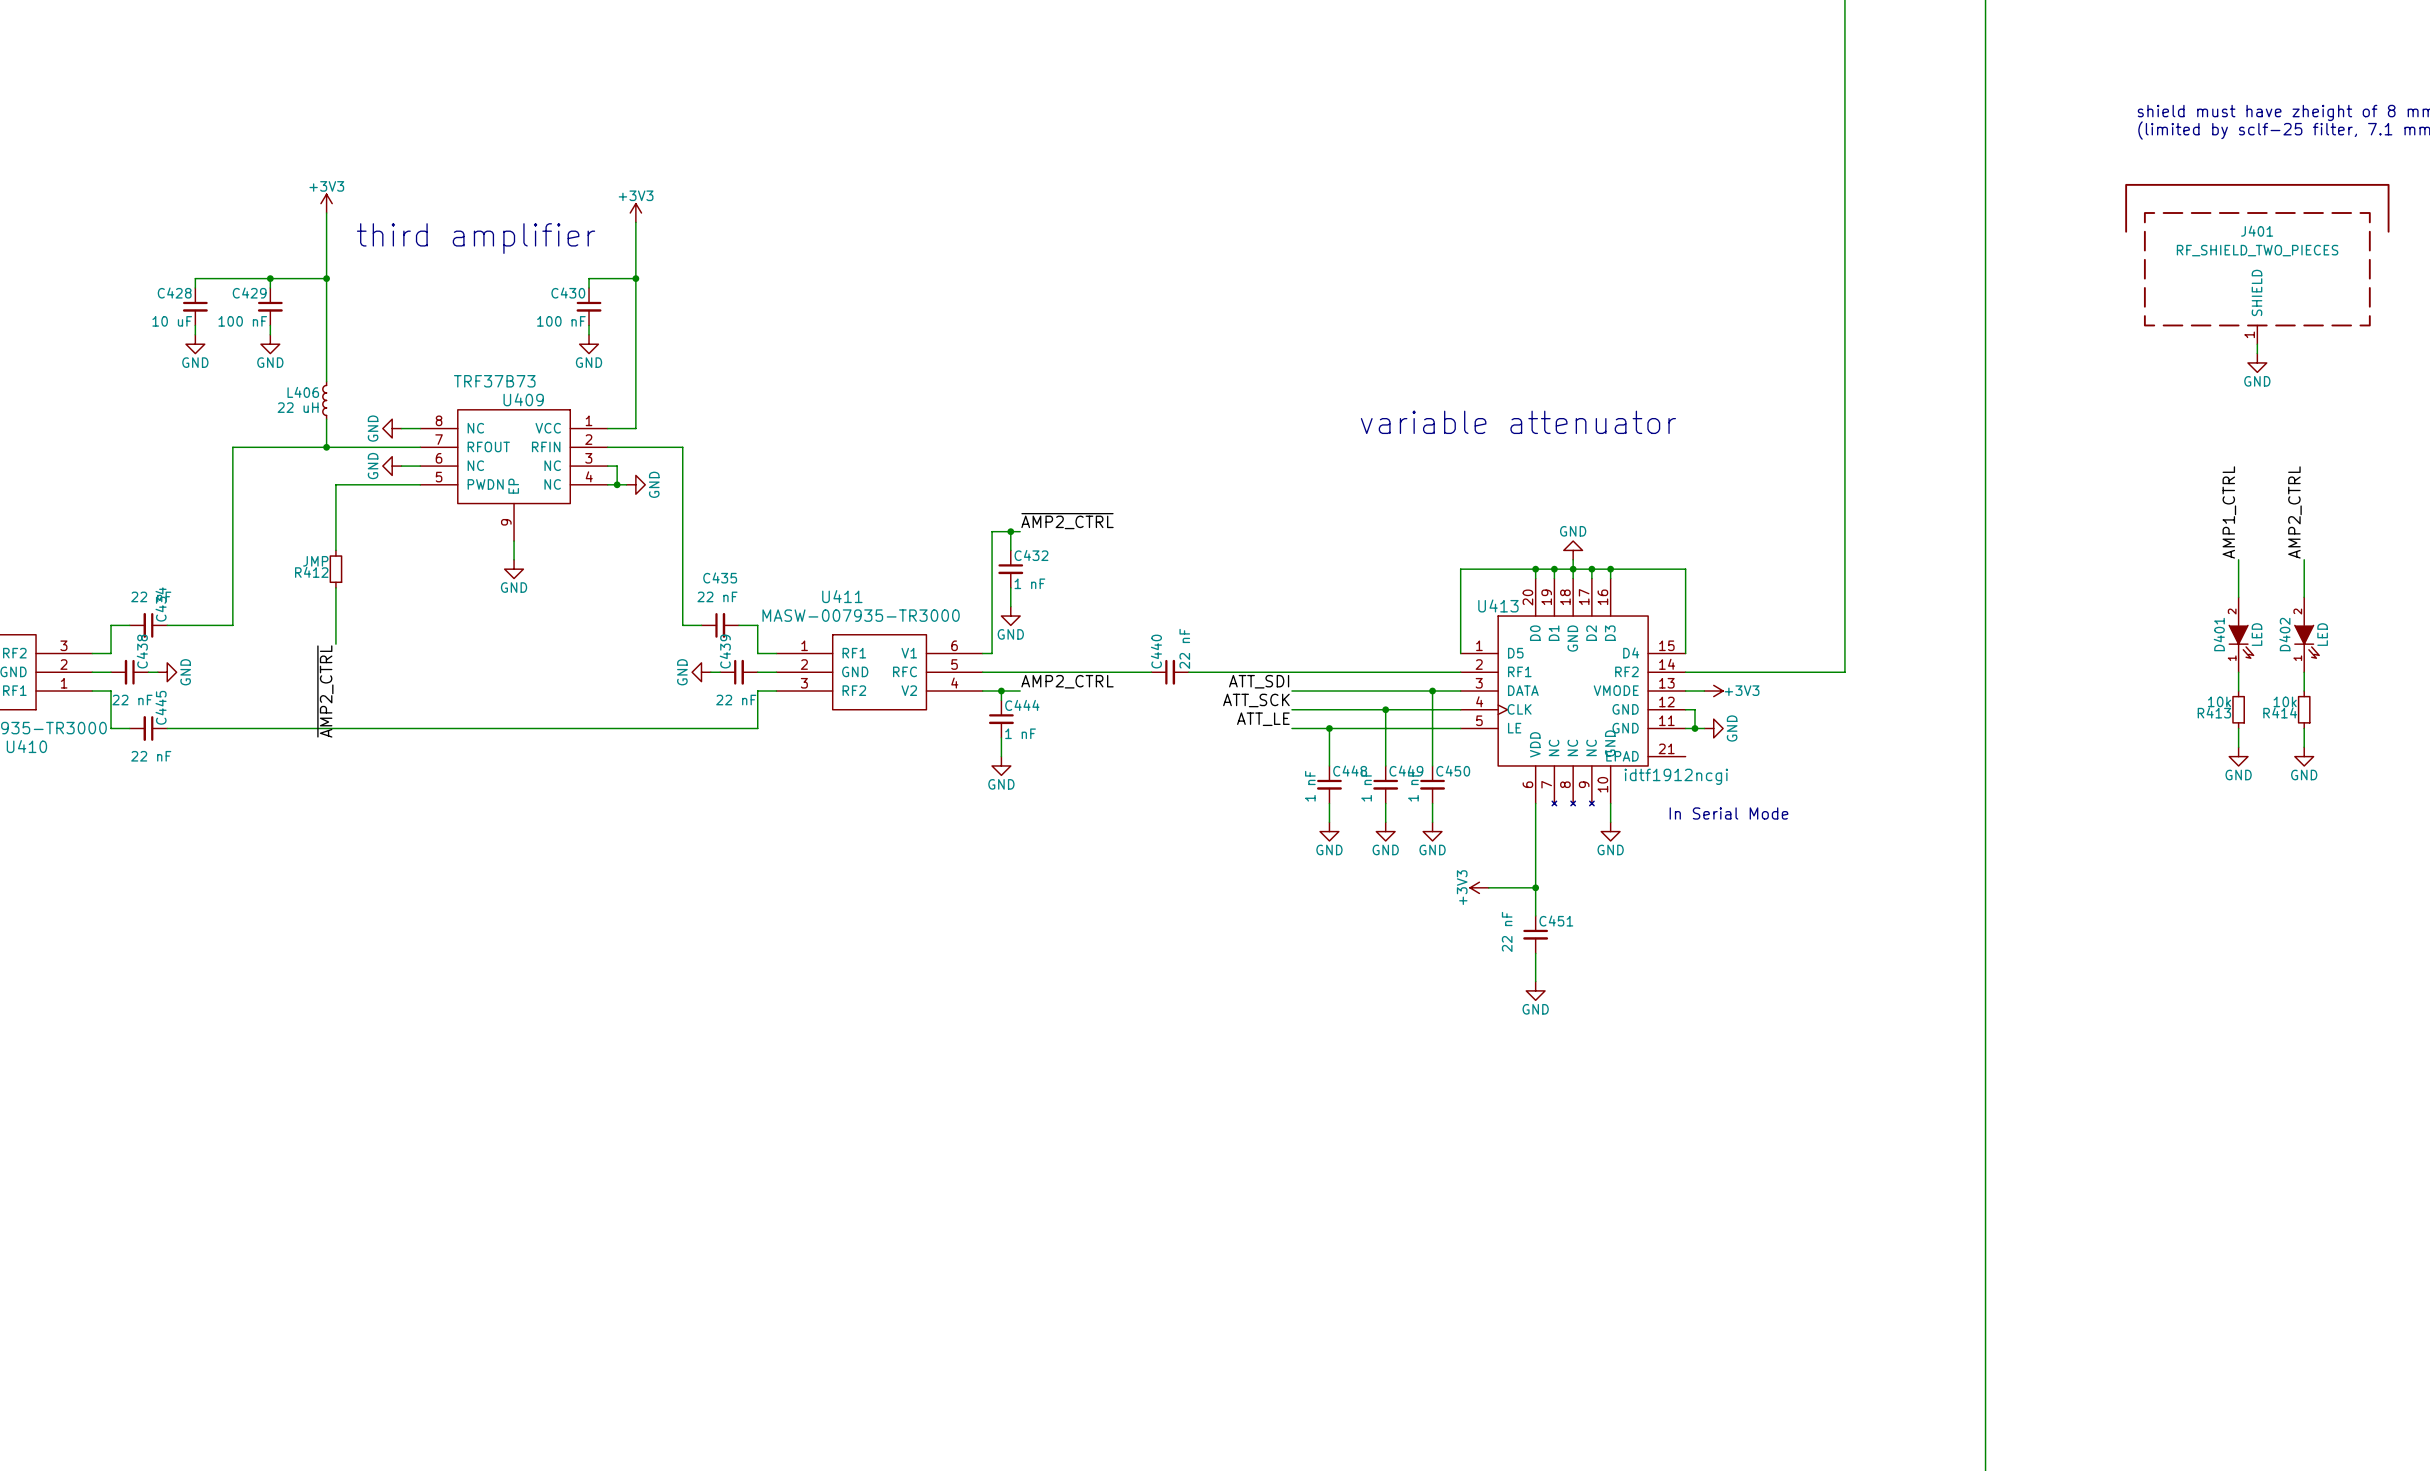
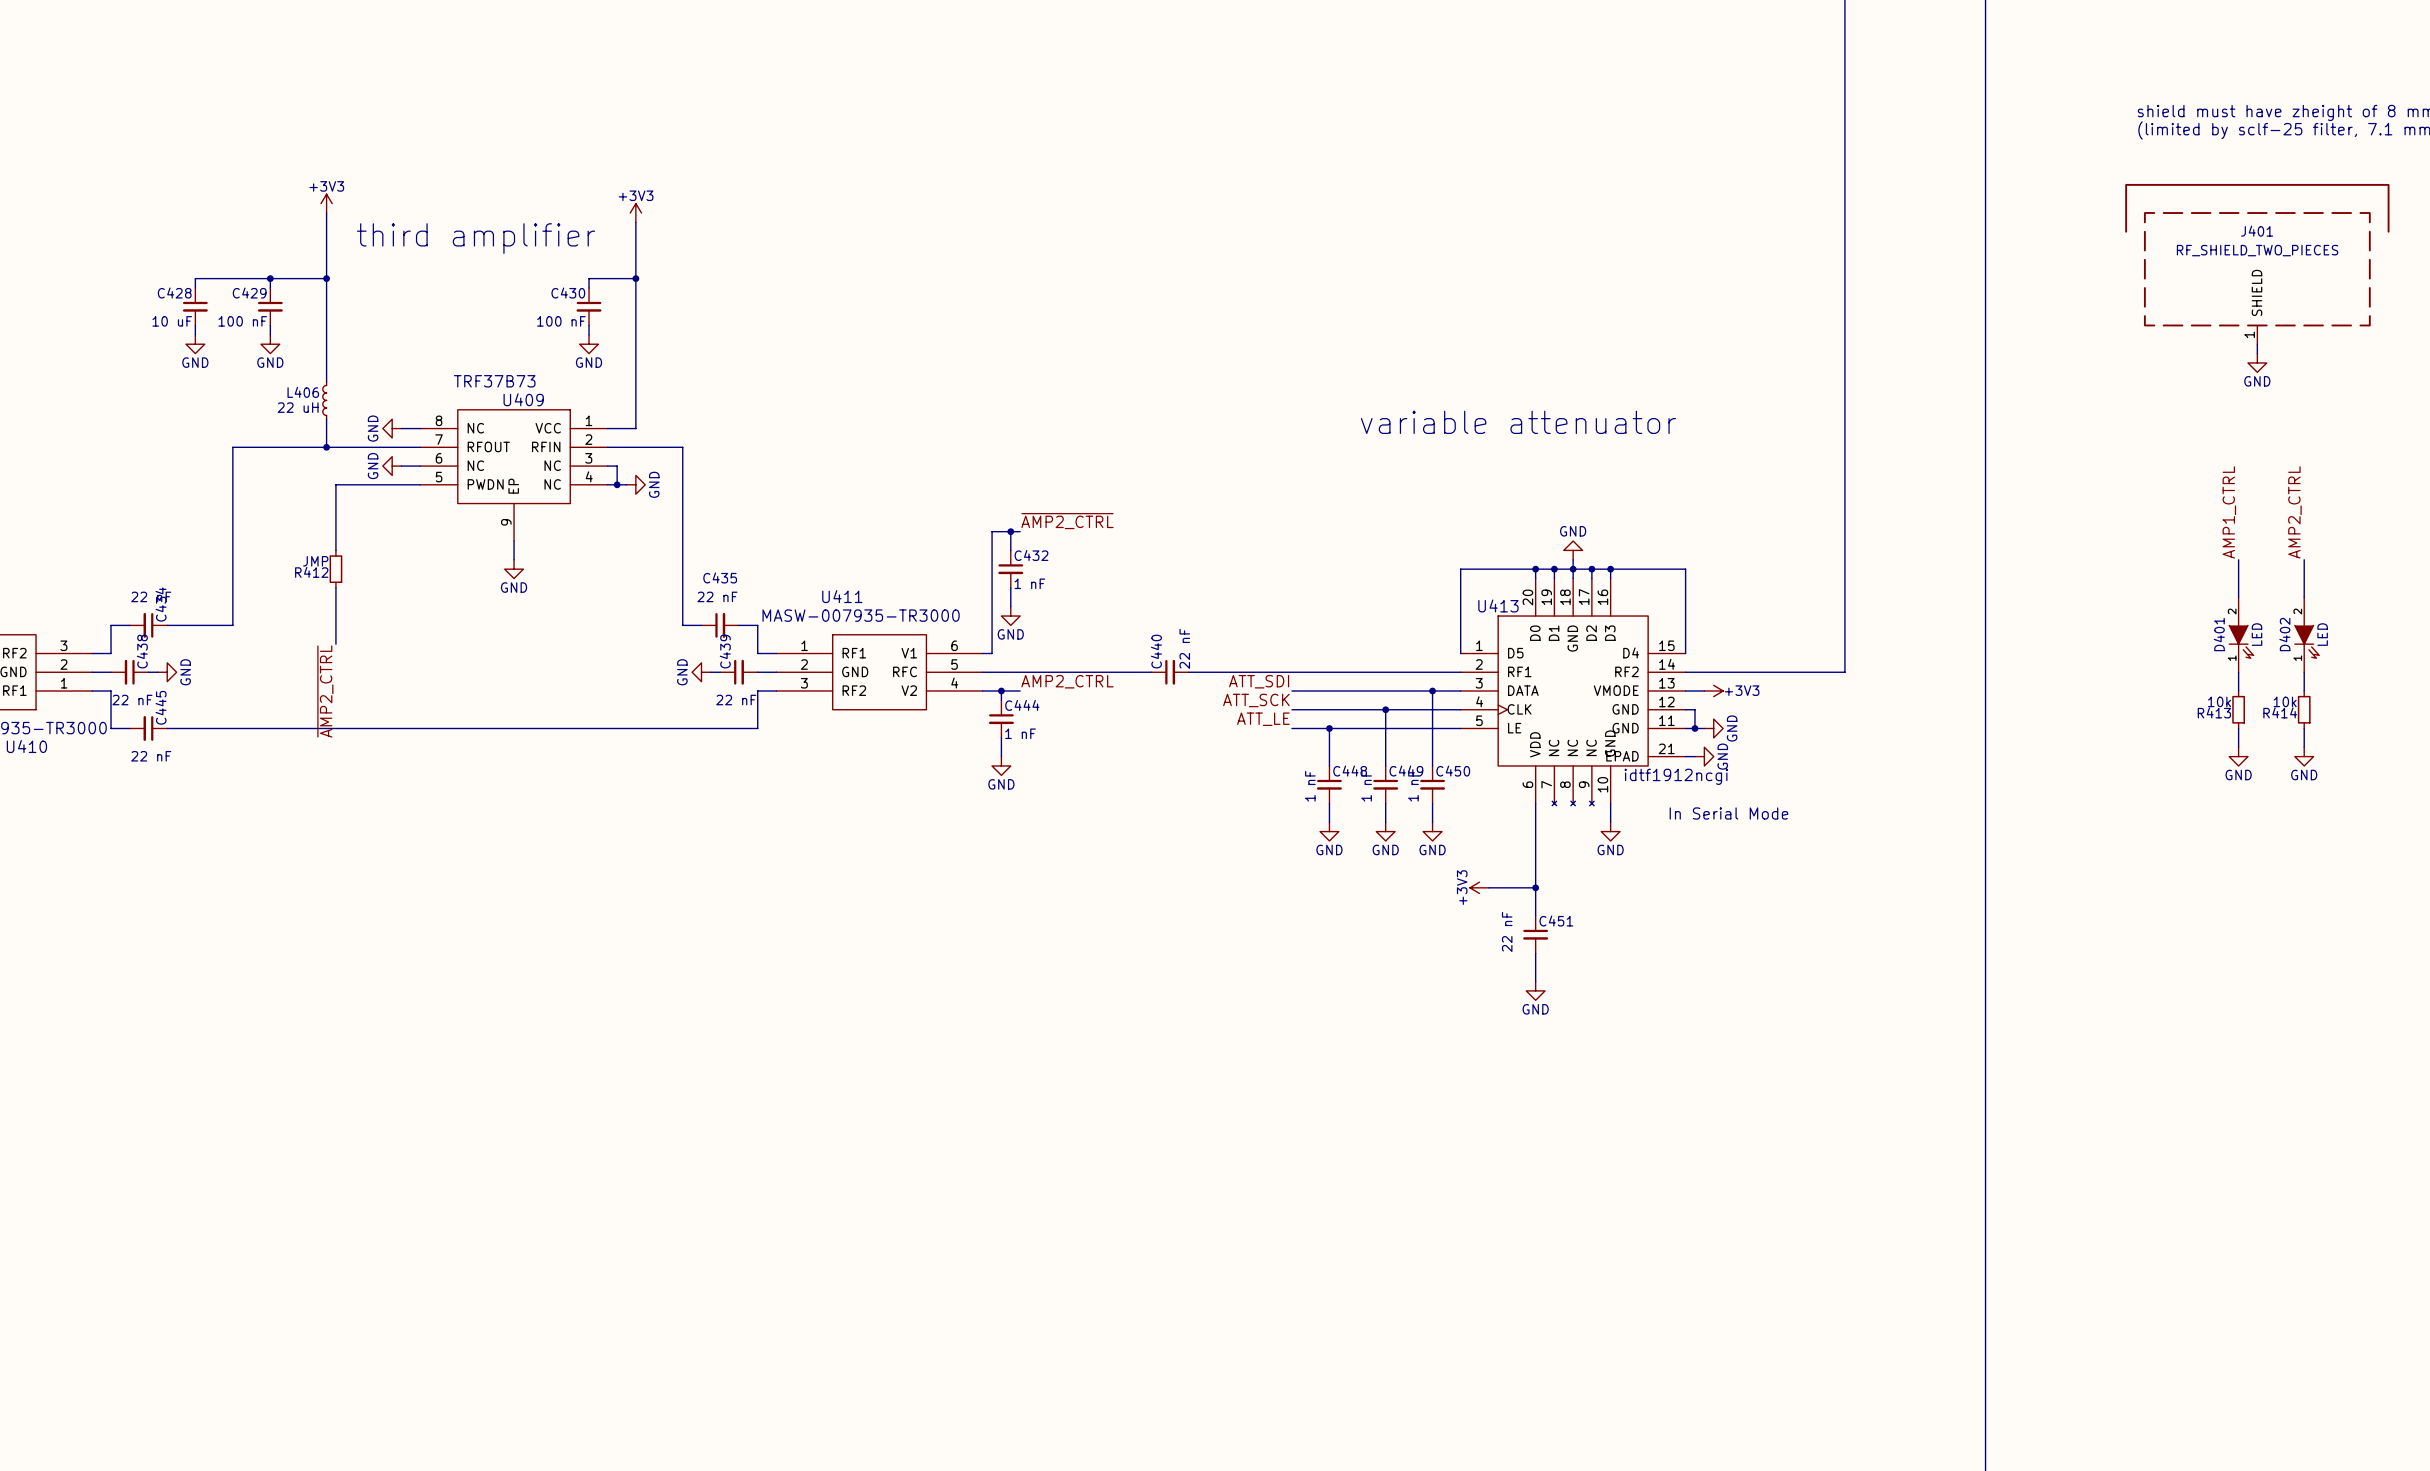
wire: none -> (1685, 756) (1694, 756)
power symbol: none -> GND (1704, 756)

